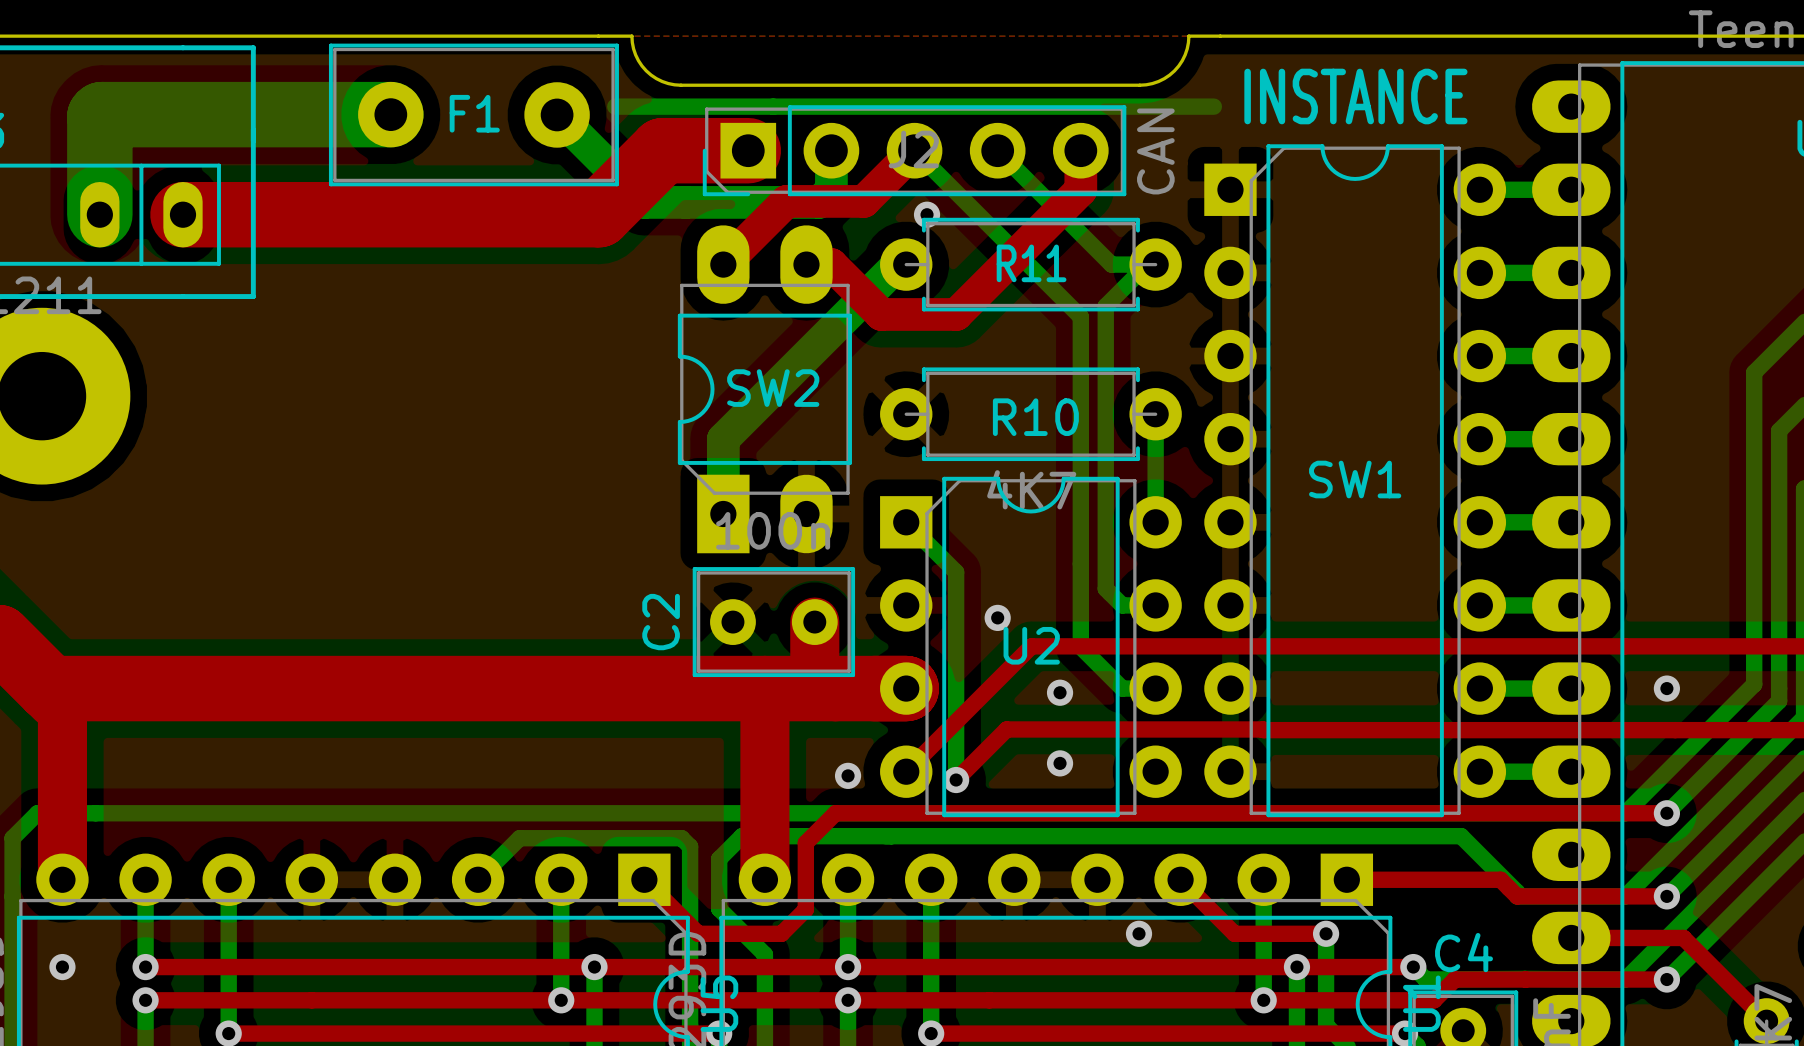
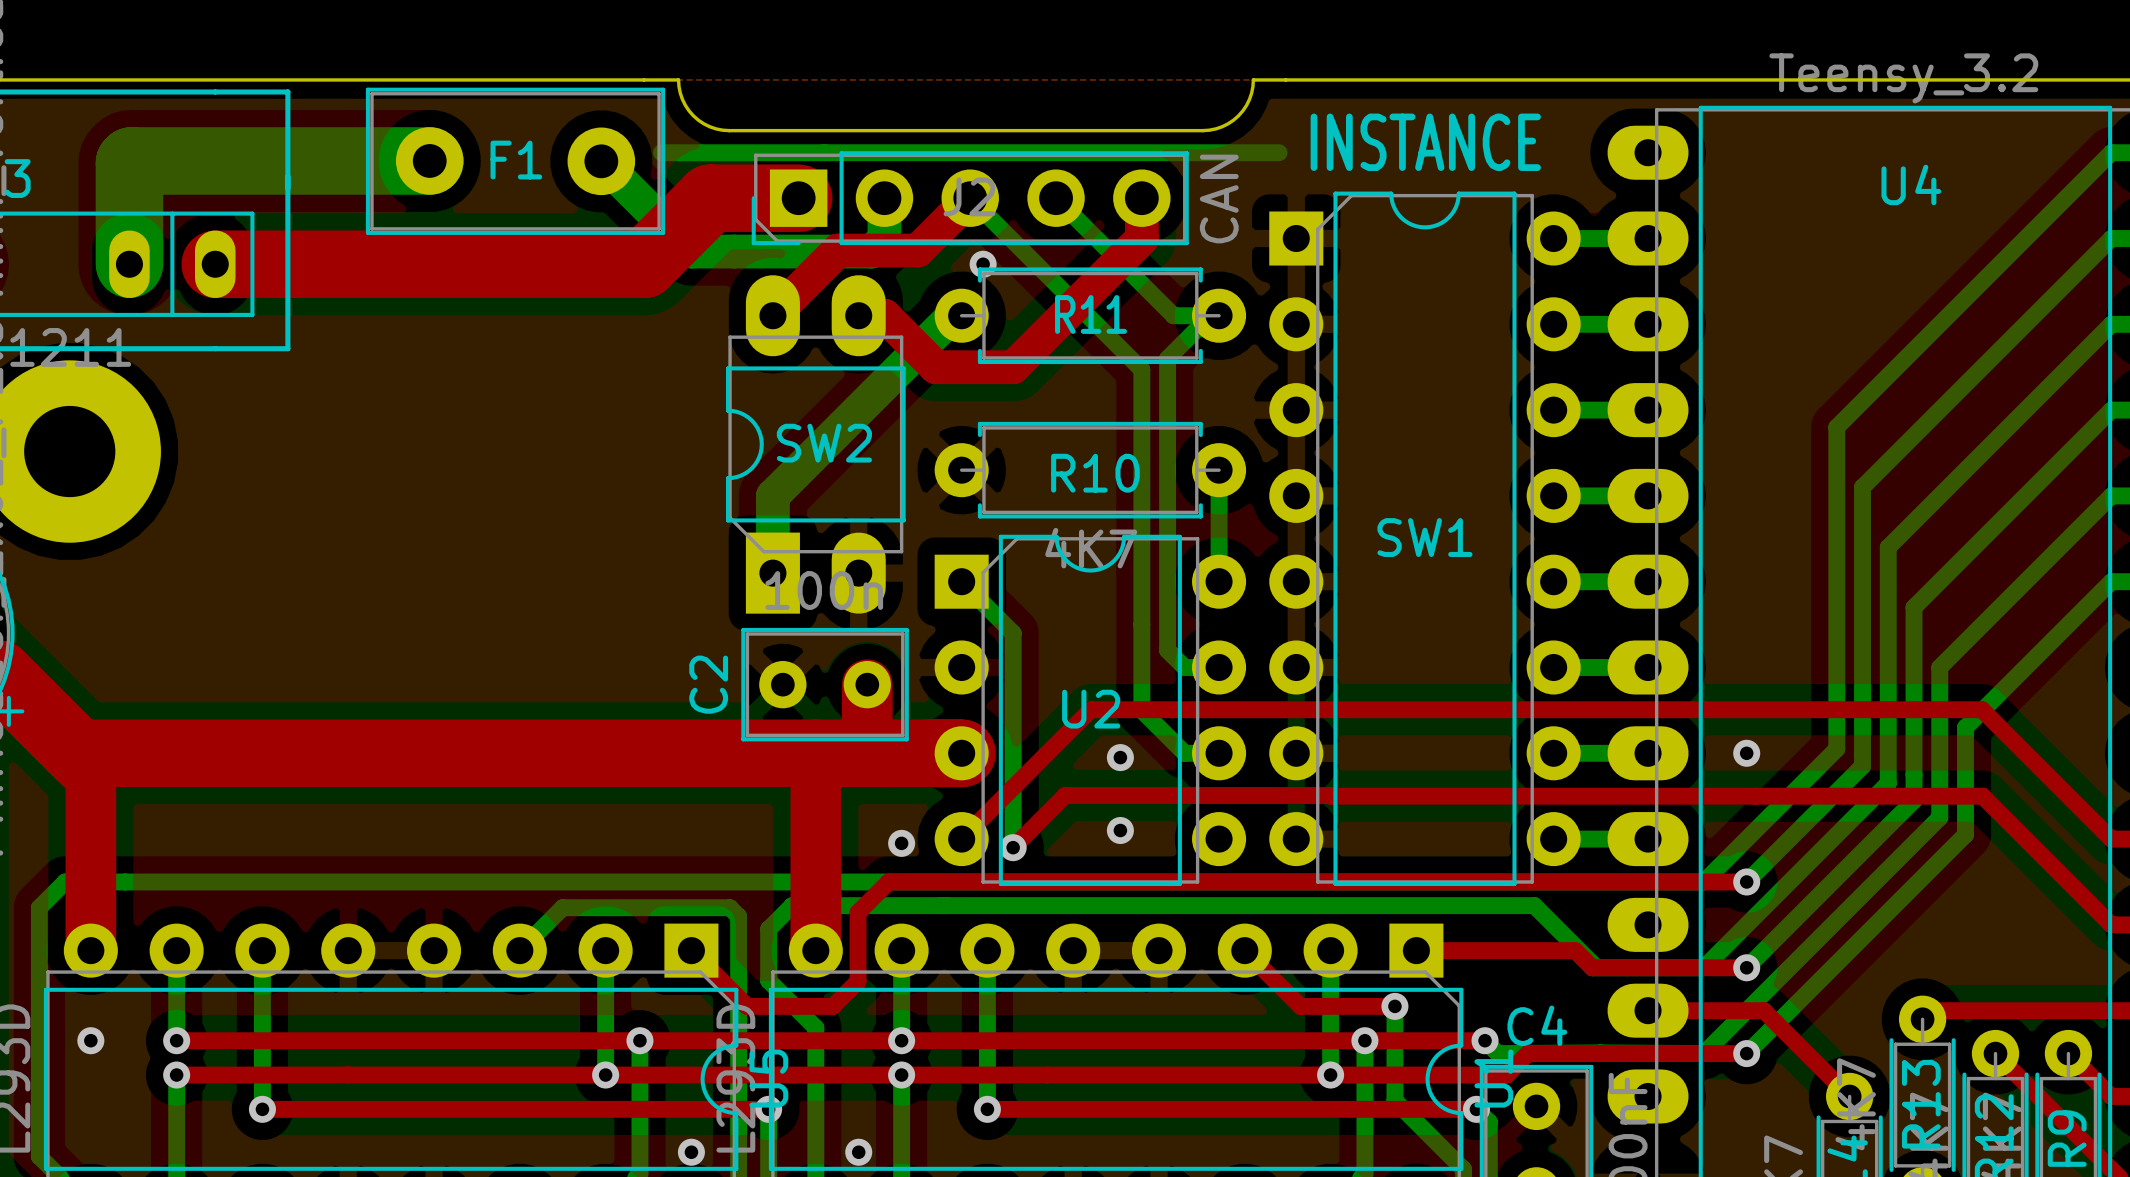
via: (997, 617) -> none
via: (1139, 933) -> none

